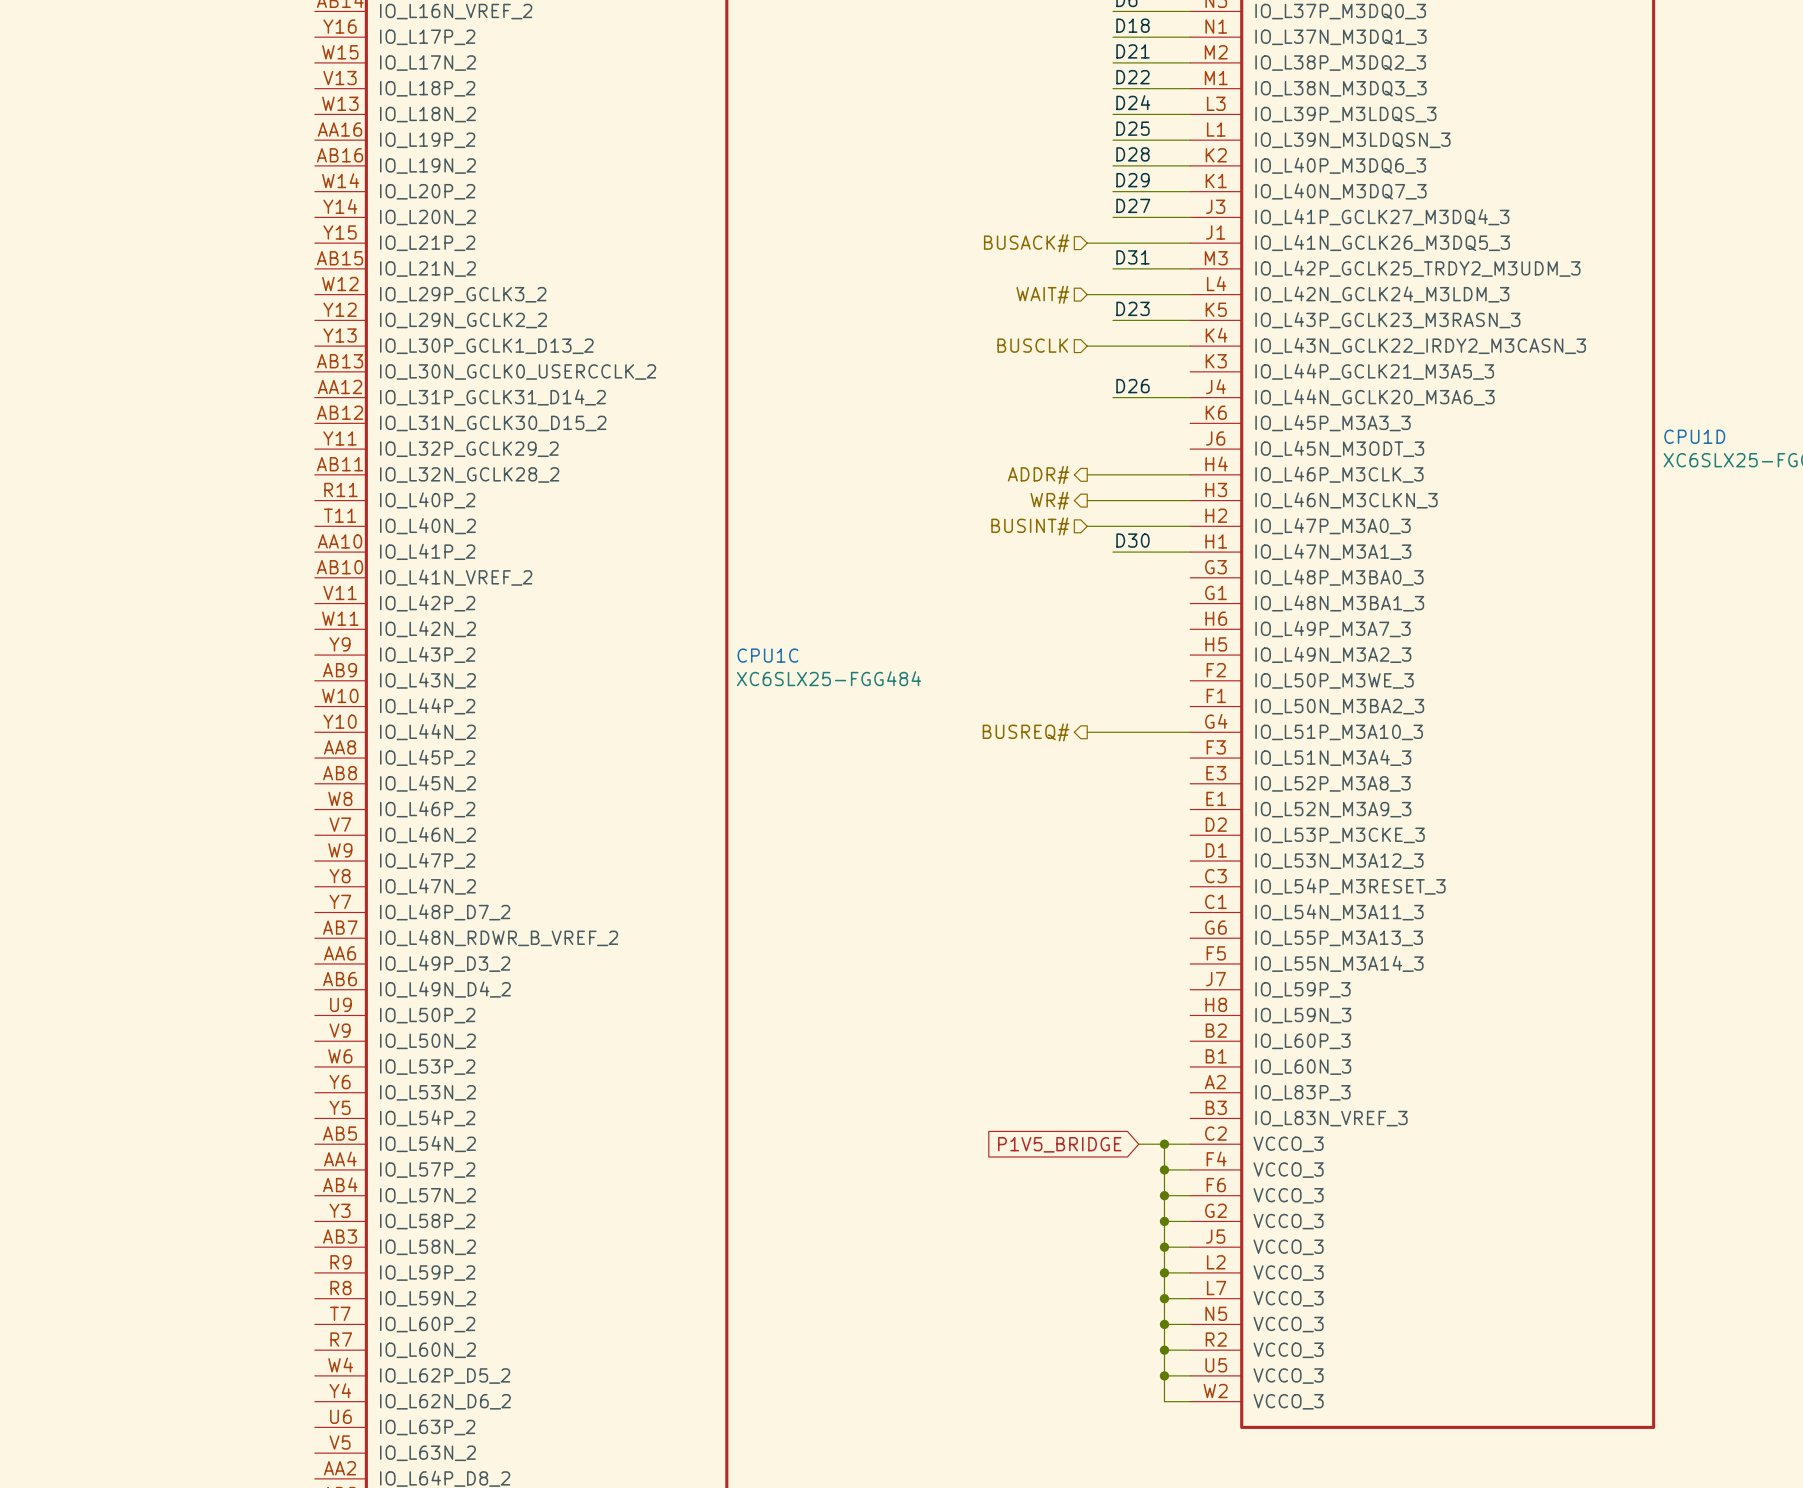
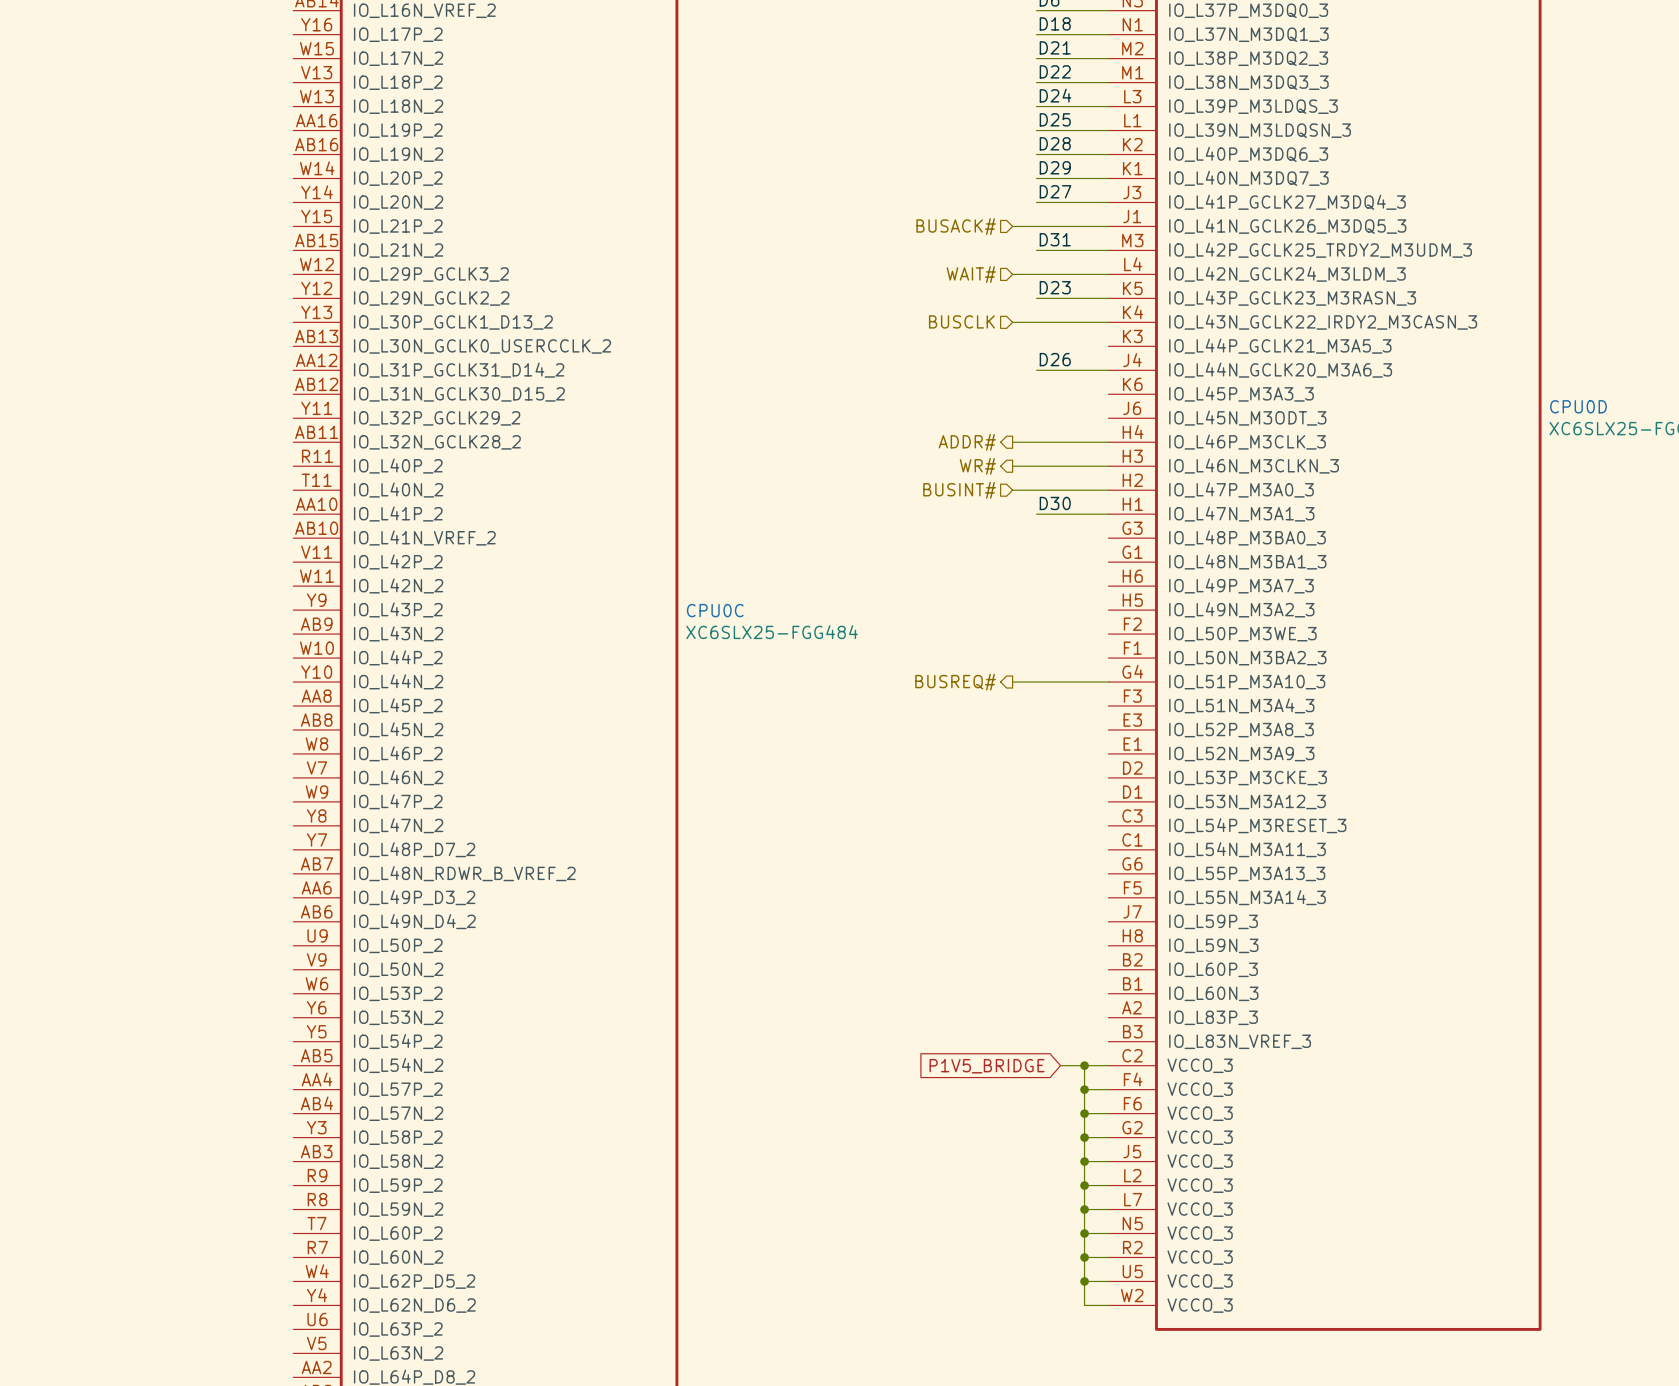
CPU1D name: CPU1D (1694, 436) -> CPU0D (1578, 406)
CPU1C name: CPU1C (767, 655) -> CPU0C (715, 610)

